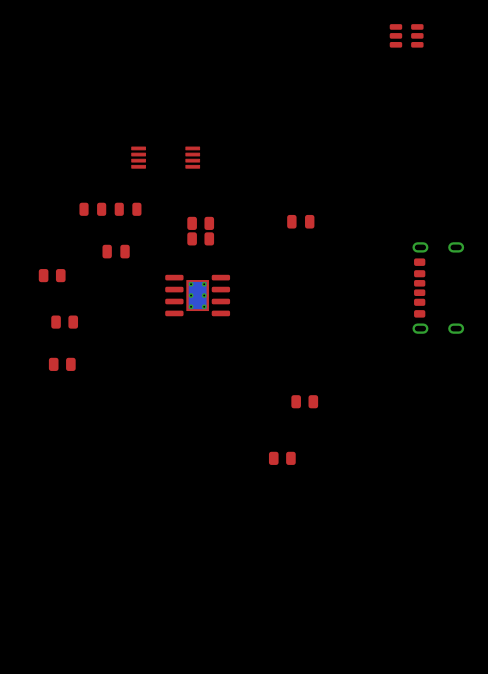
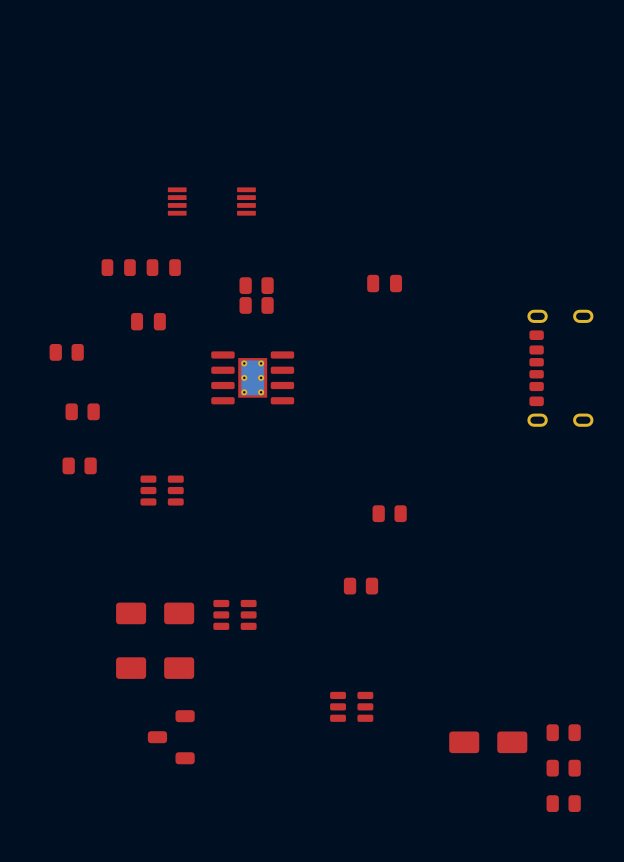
part: (406, 35) -> none
part: none -> (162, 490)
part: none -> (155, 613)
part: none -> (234, 614)
part: none -> (155, 668)
part: none -> (351, 706)
part: none -> (563, 732)
part: none -> (171, 737)
part: none -> (488, 742)
part: none -> (563, 768)
part: none -> (563, 803)

